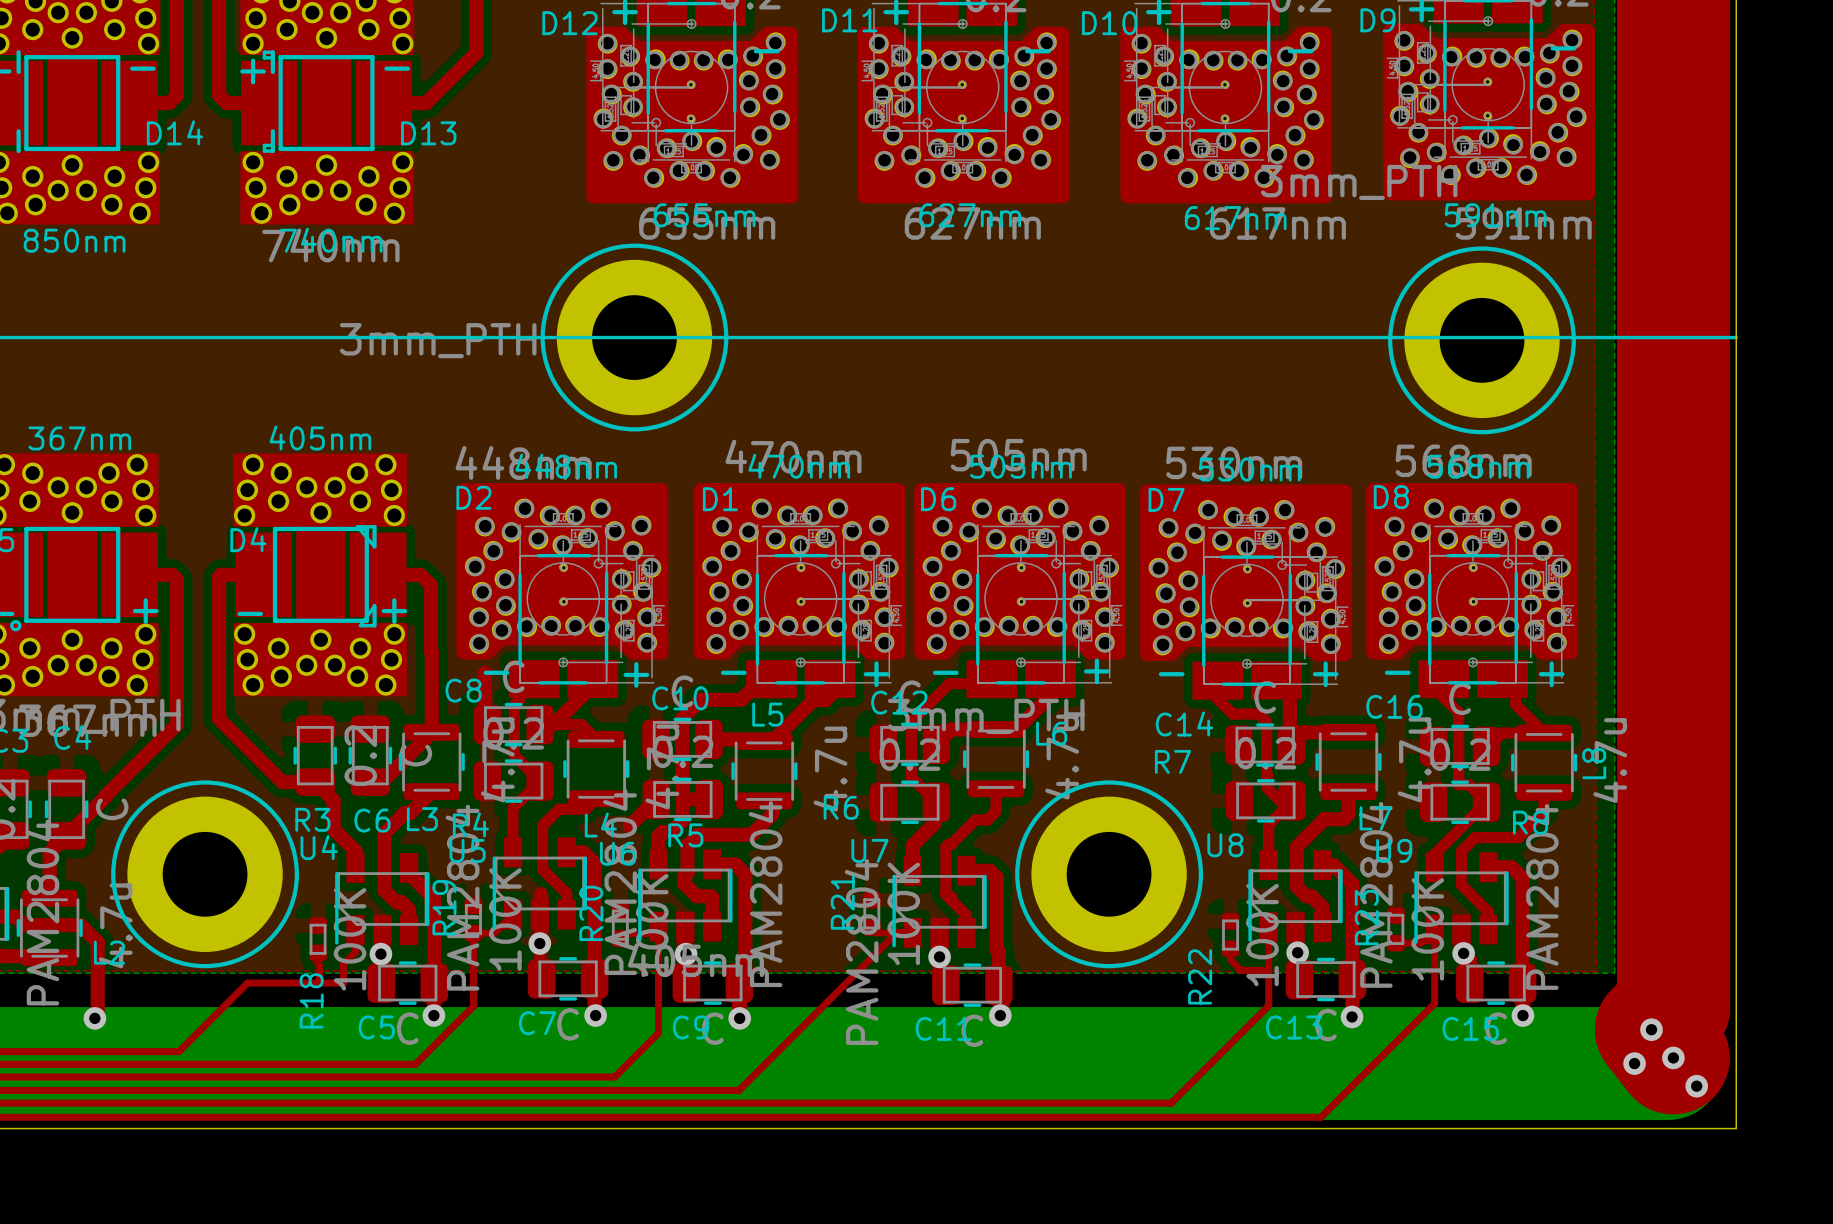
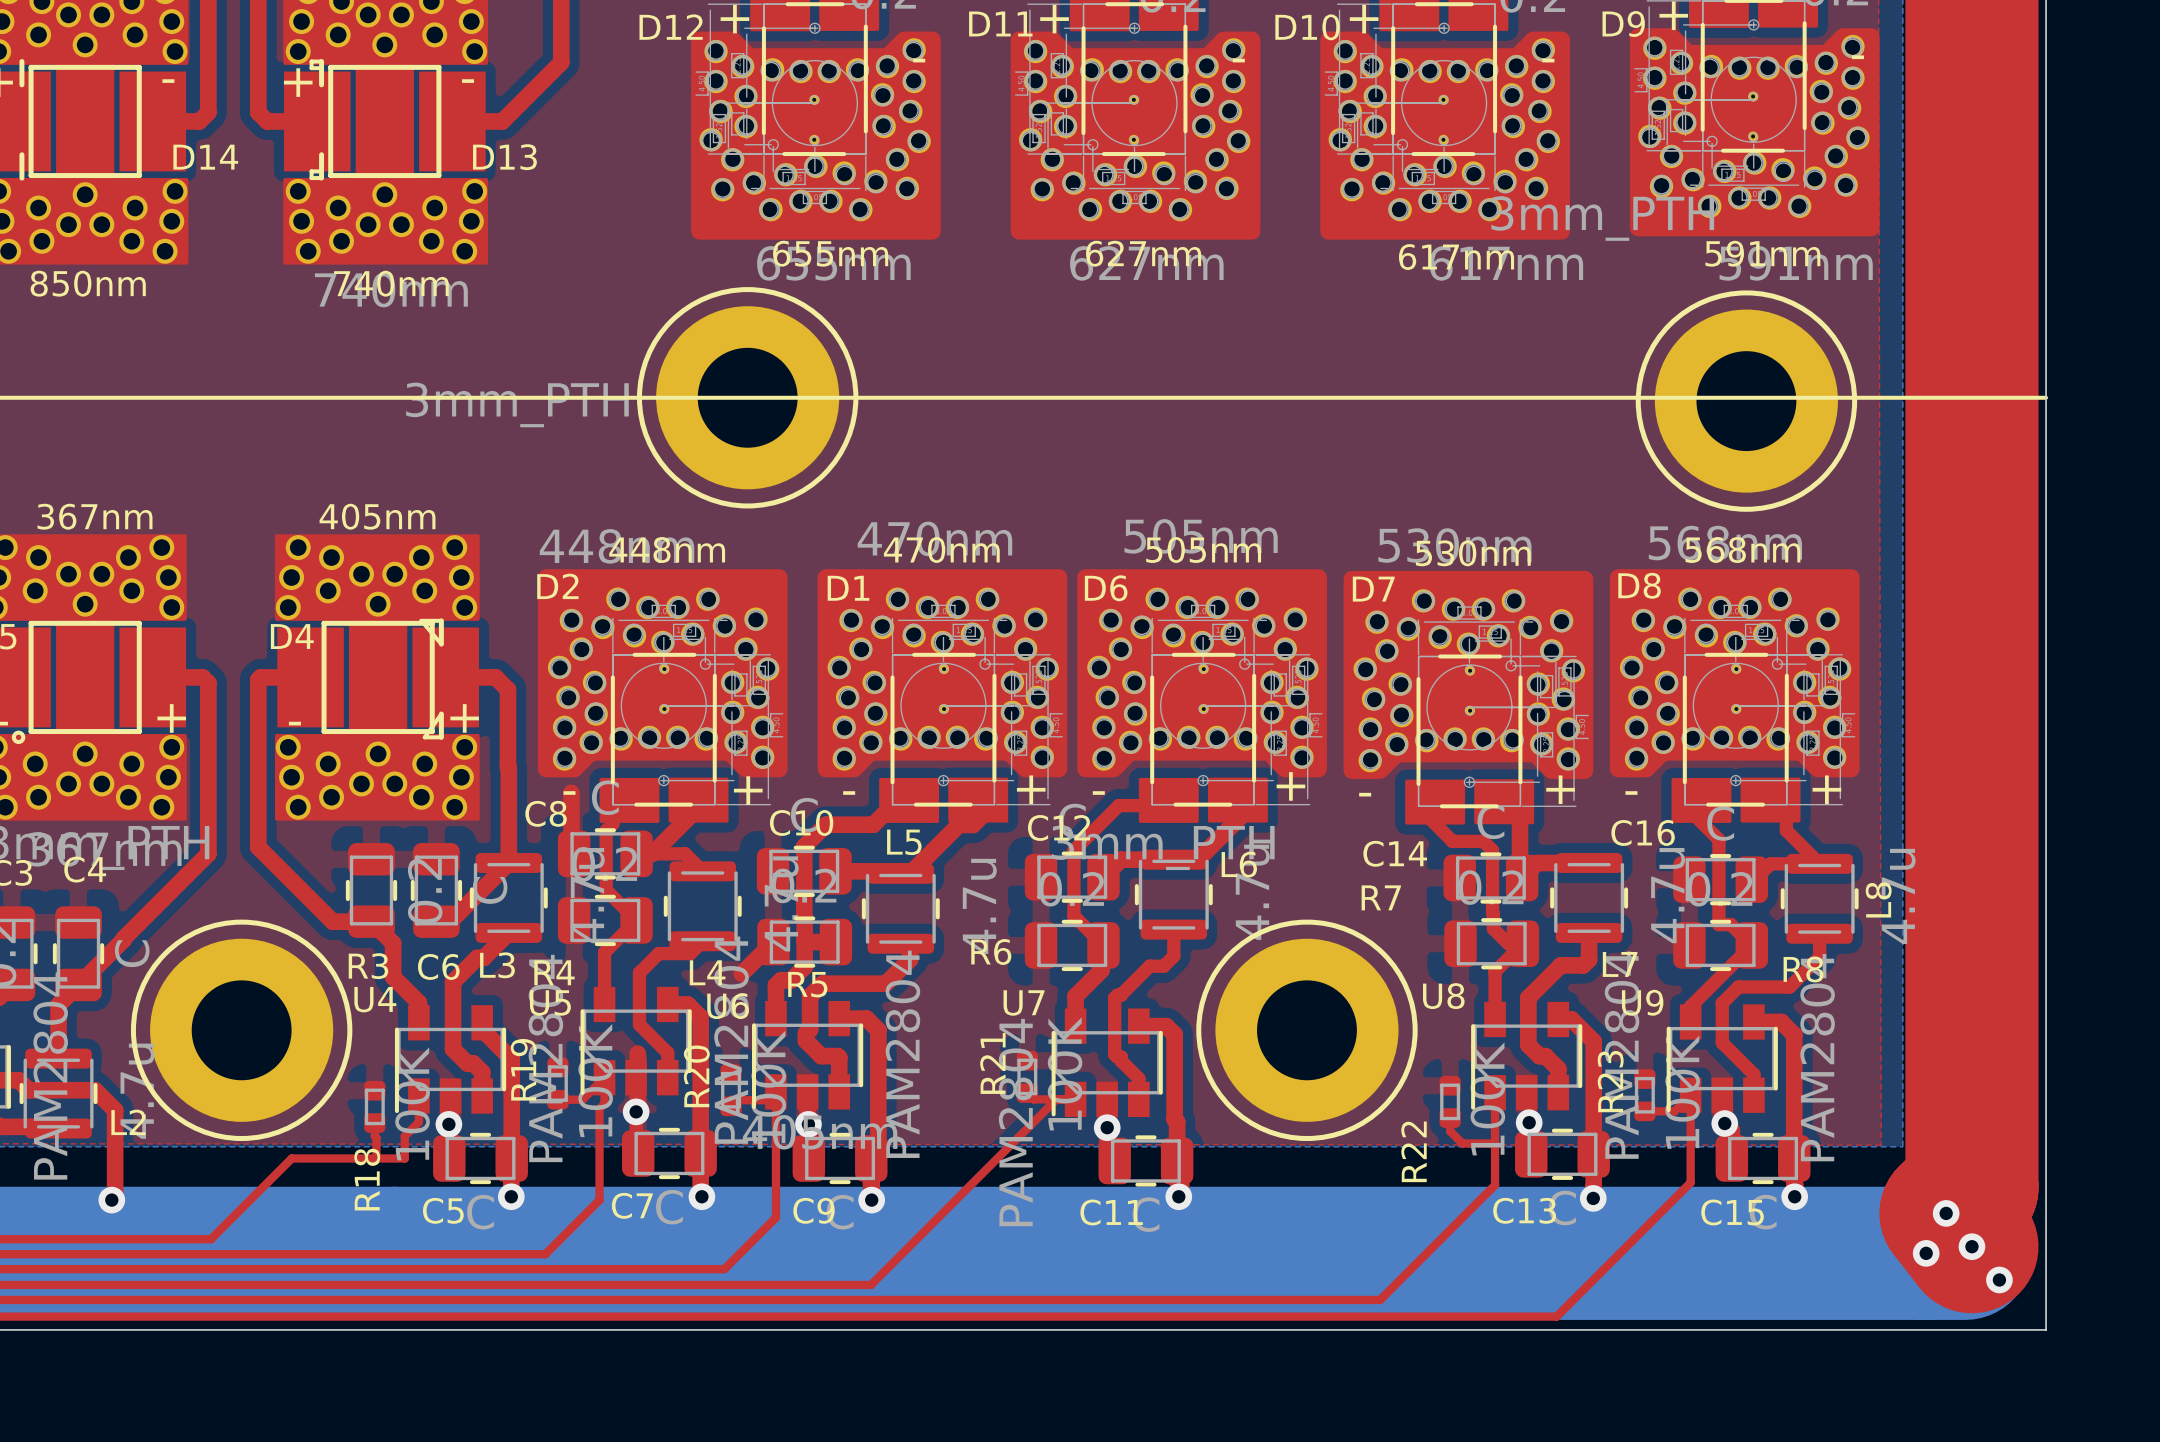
top track: (473, 933) (473, 1006) (415, 1064) -> (604, 1077) (604, 1103) (599, 1108) (599, 1200) (545, 1254) (489, 1254)

